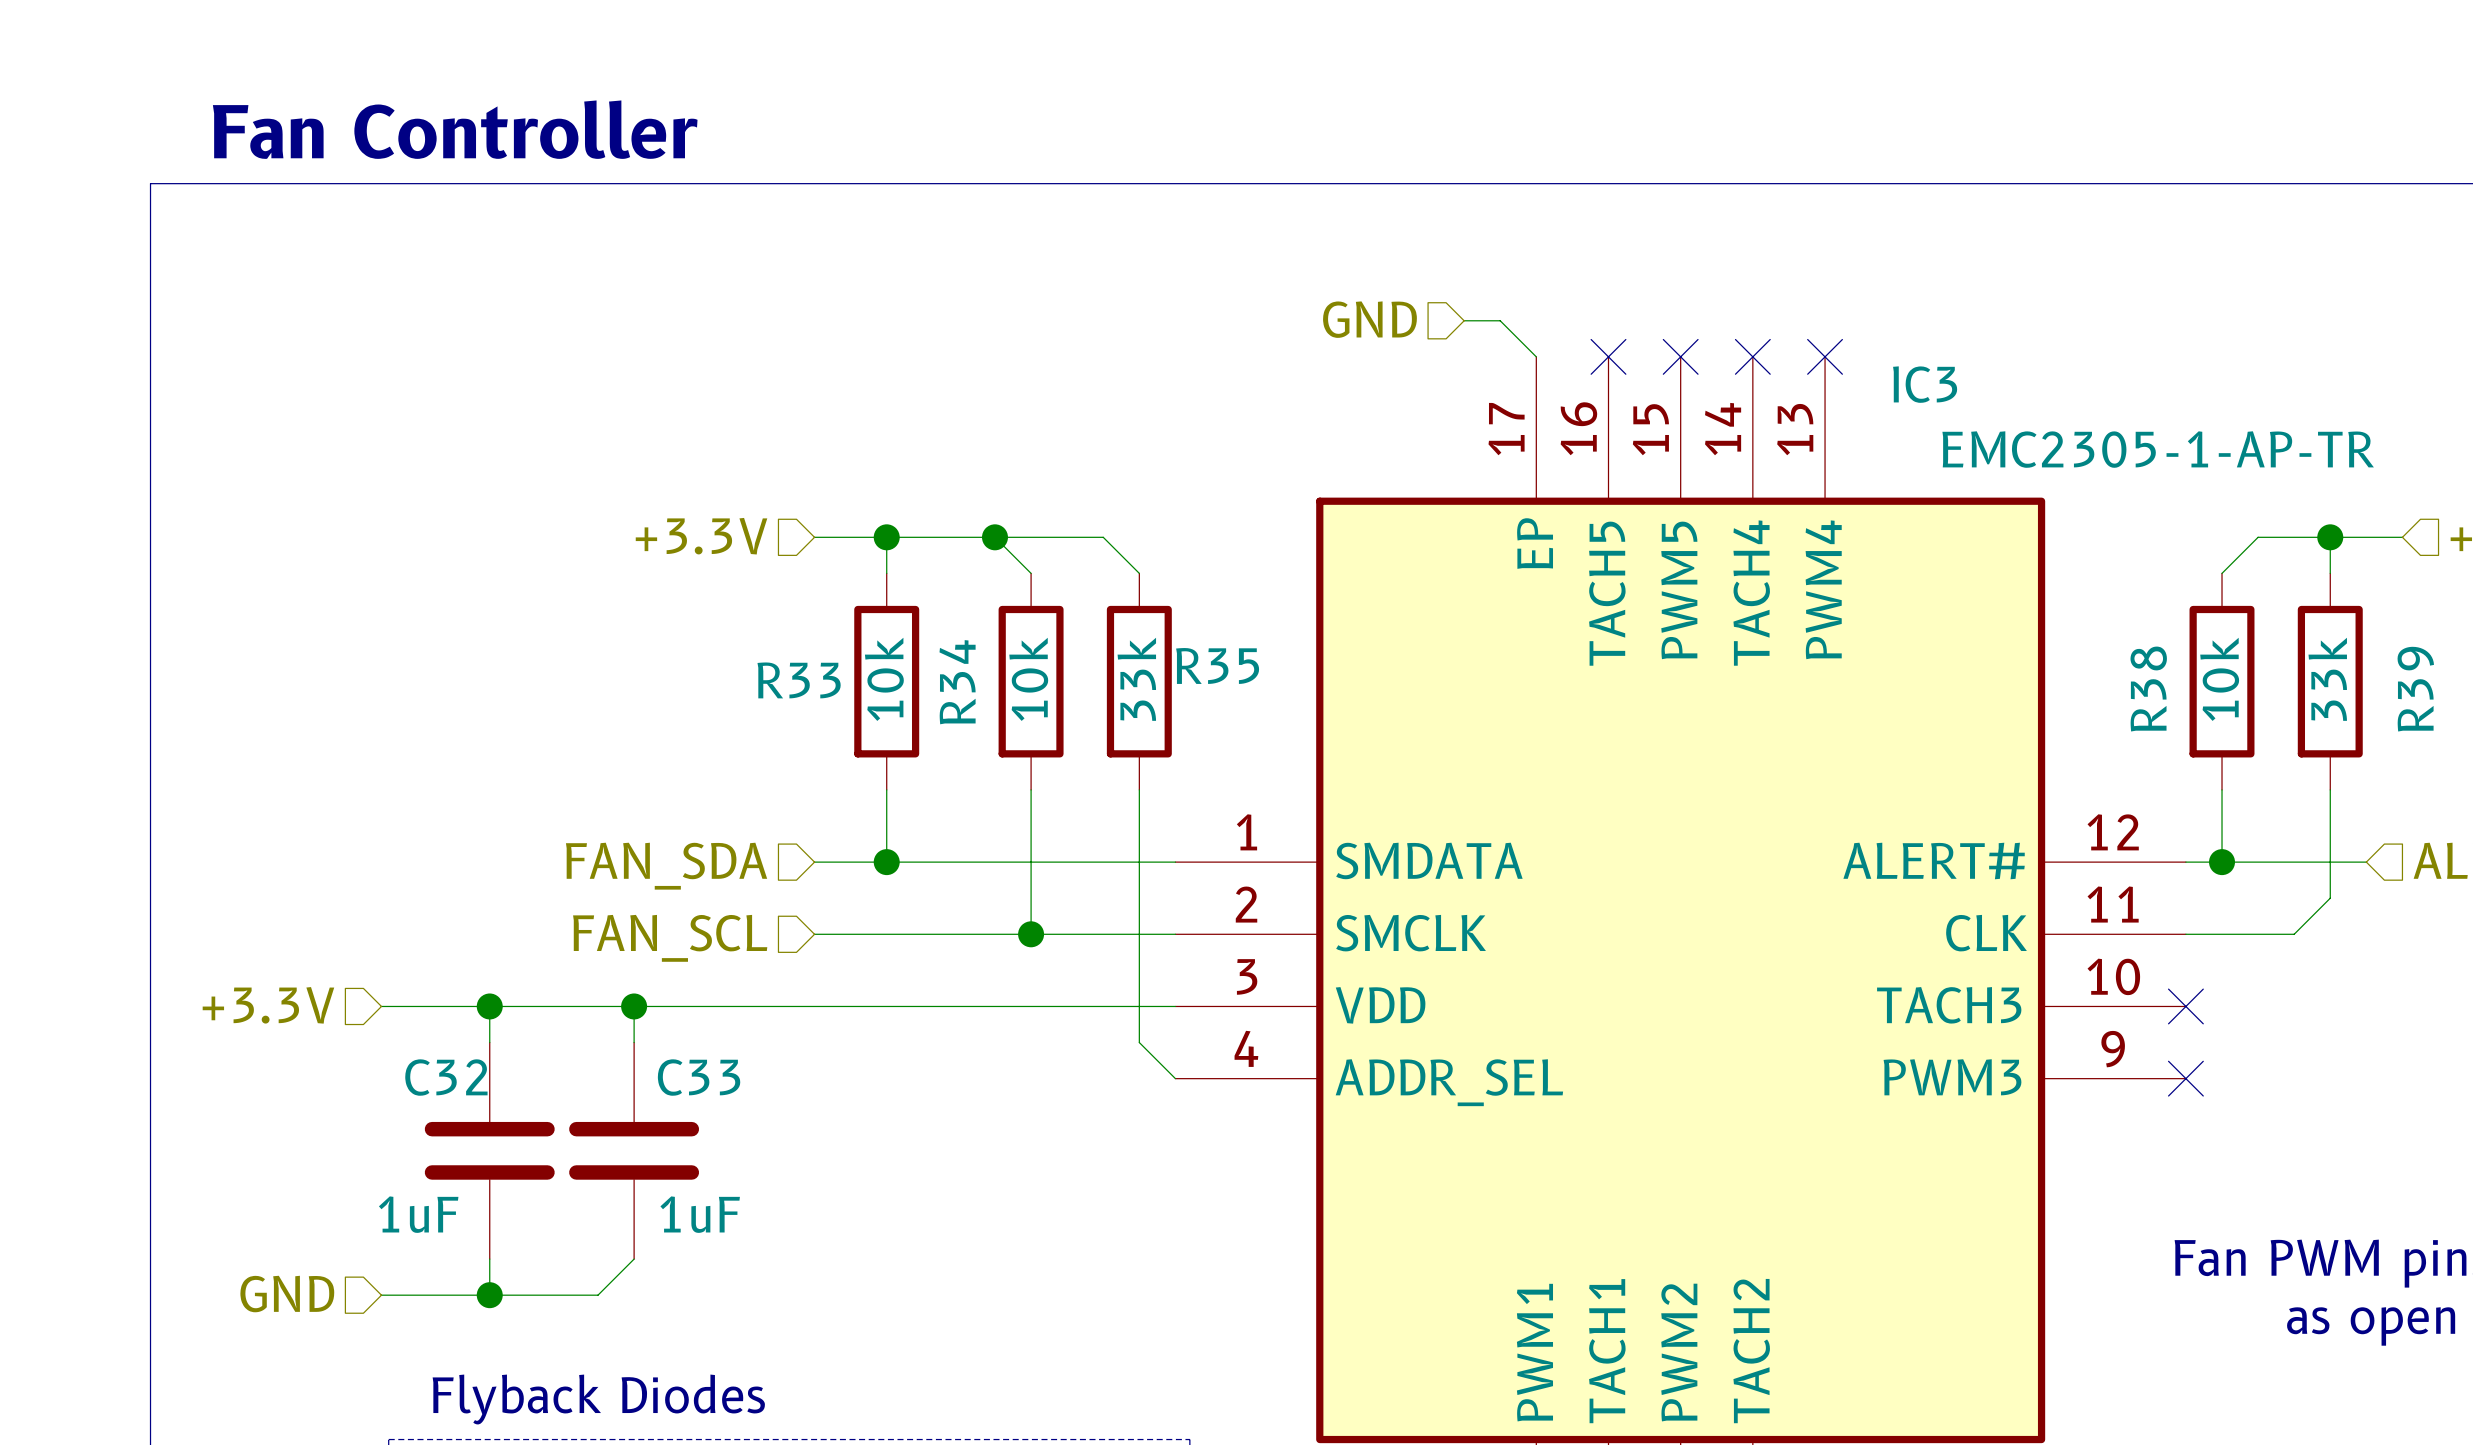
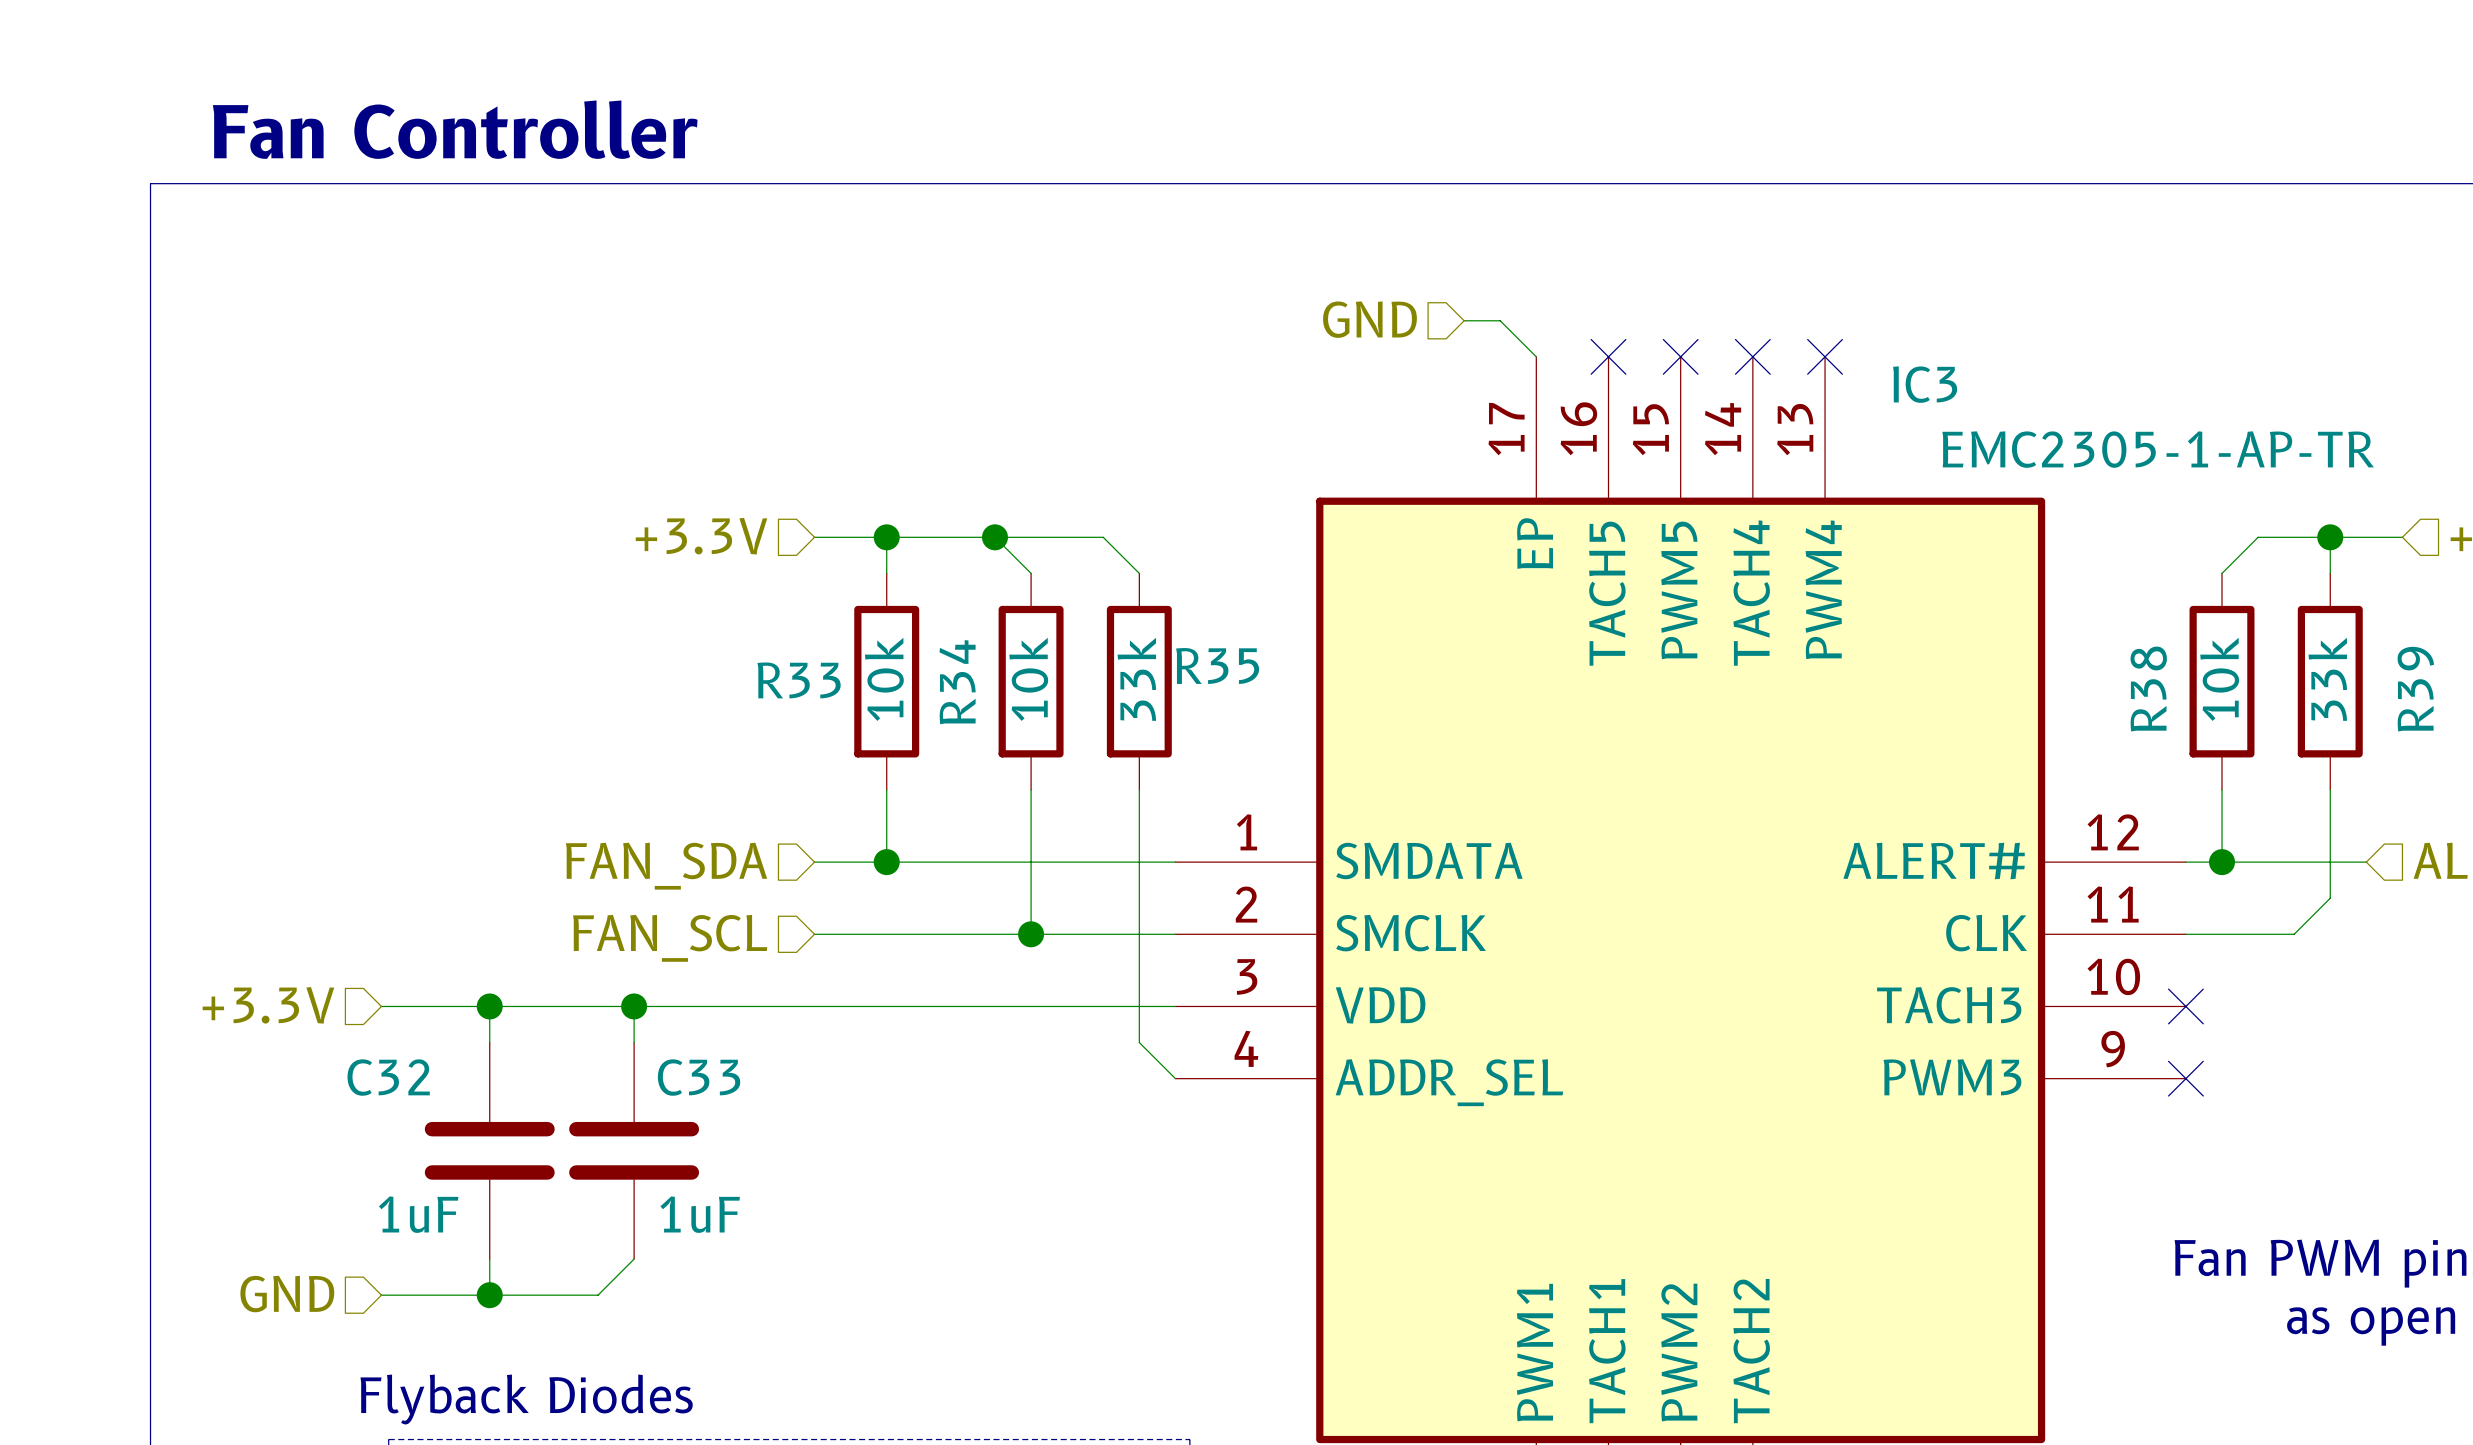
C32 name position: C32 (446, 1077) -> C32 (388, 1077)
text position: Flyback Diodes (598, 1399) -> Flyback Diodes (526, 1399)

